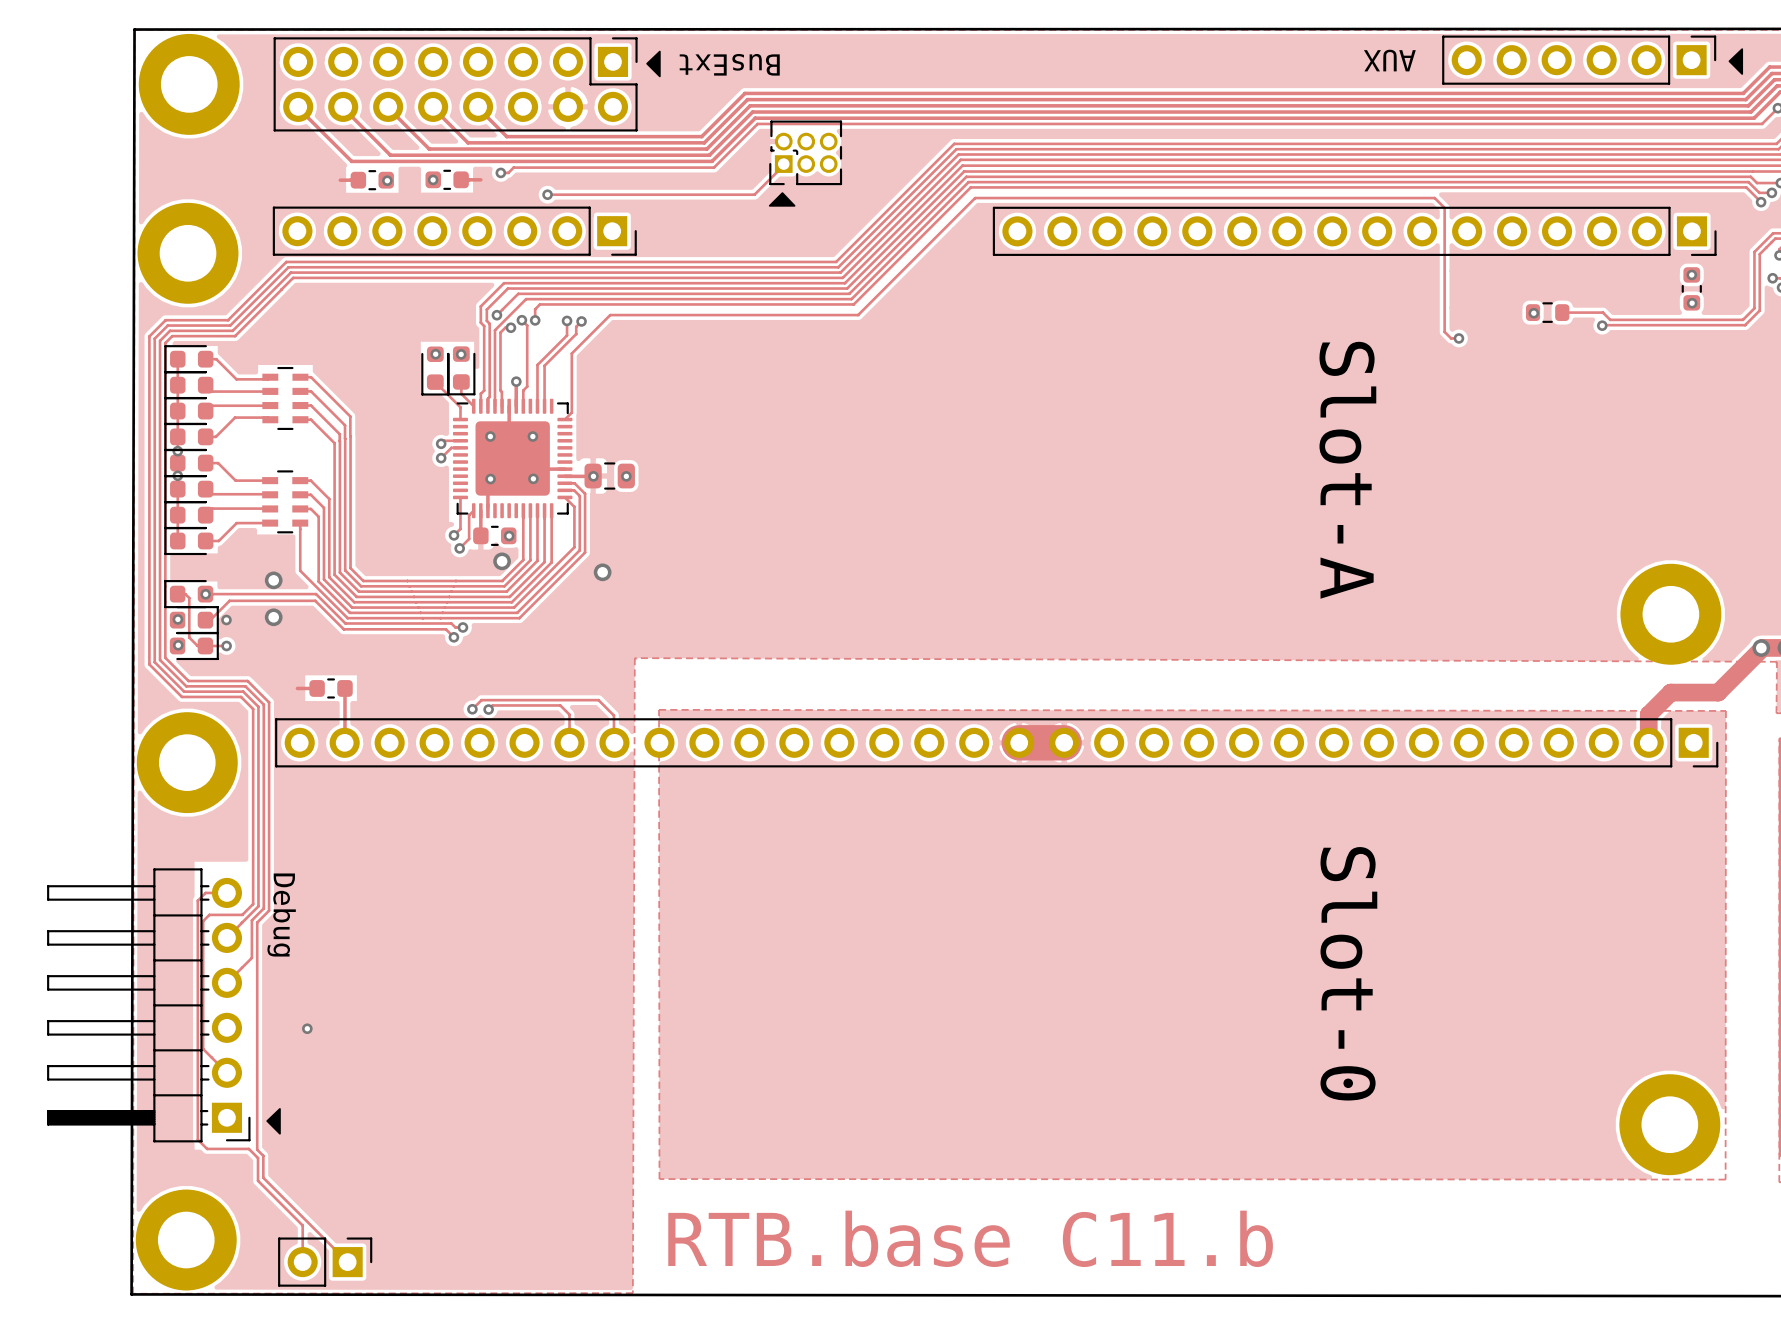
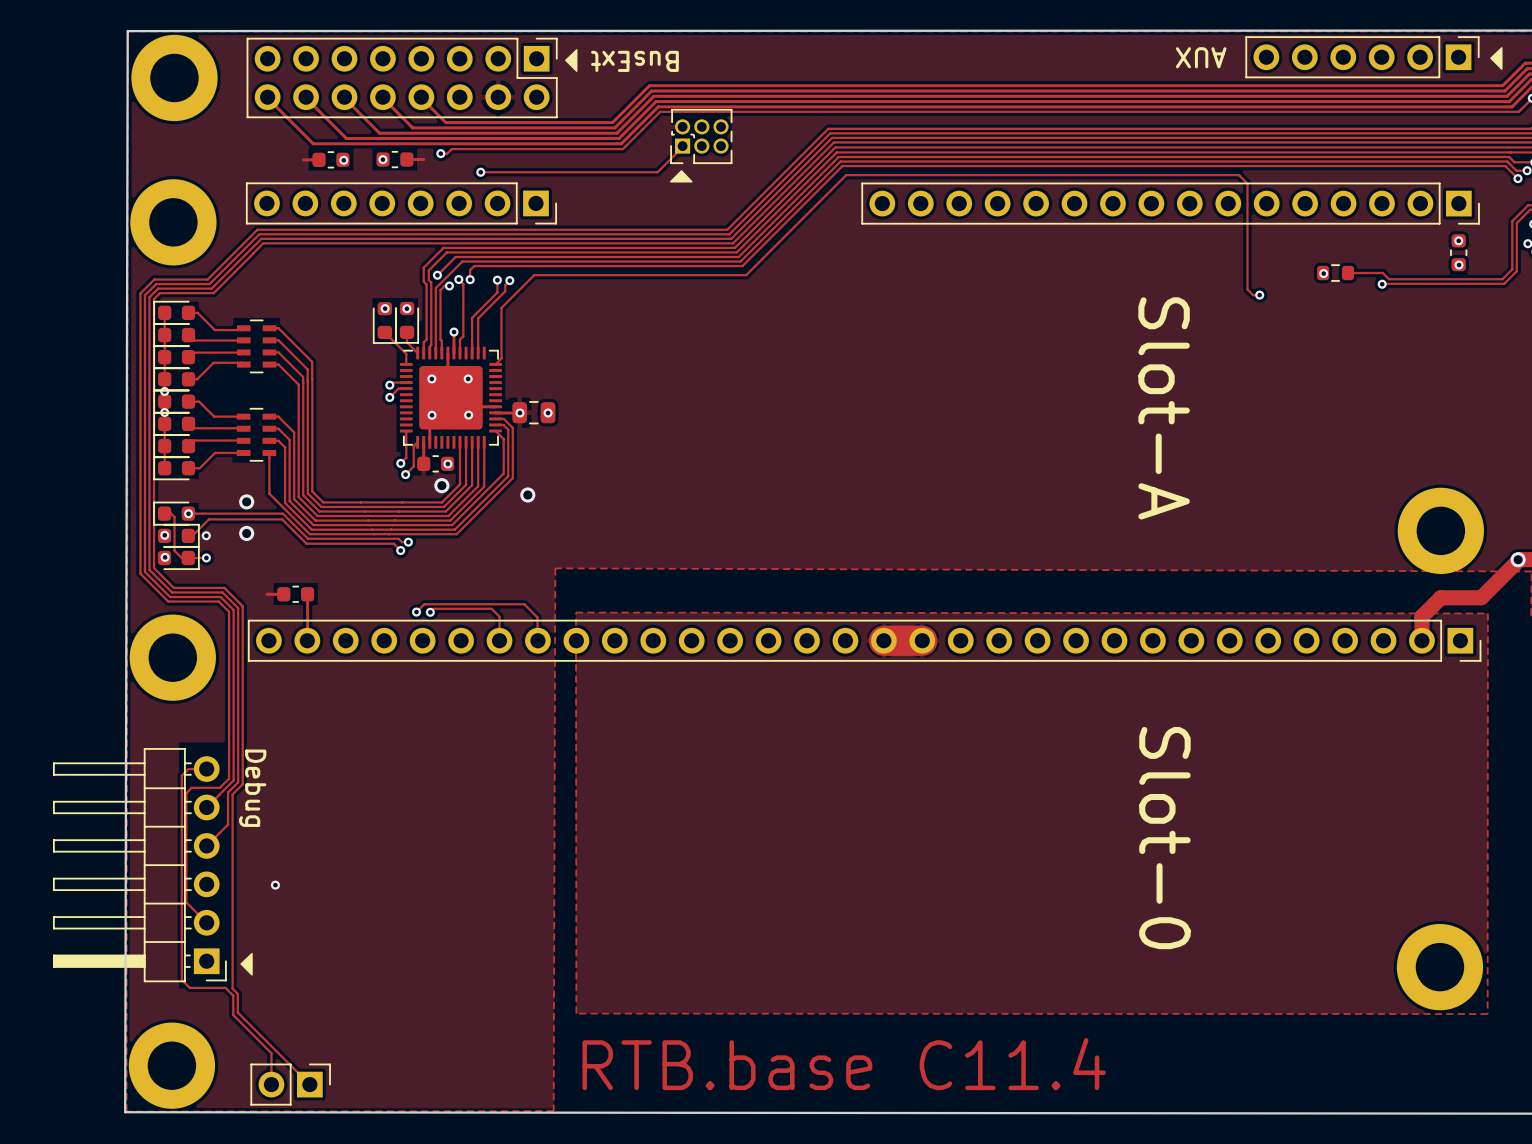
text: RTB.base C11.b (970, 1238) -> RTB.base C11.4 (844, 1064)

